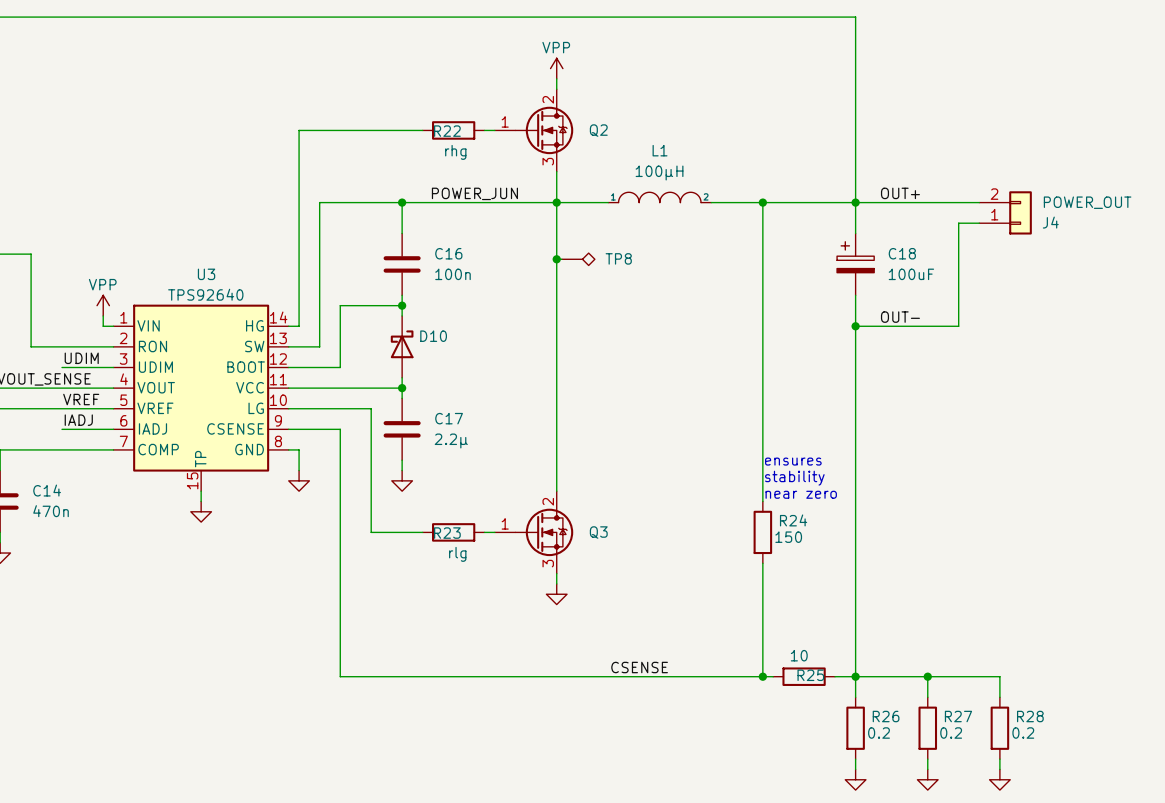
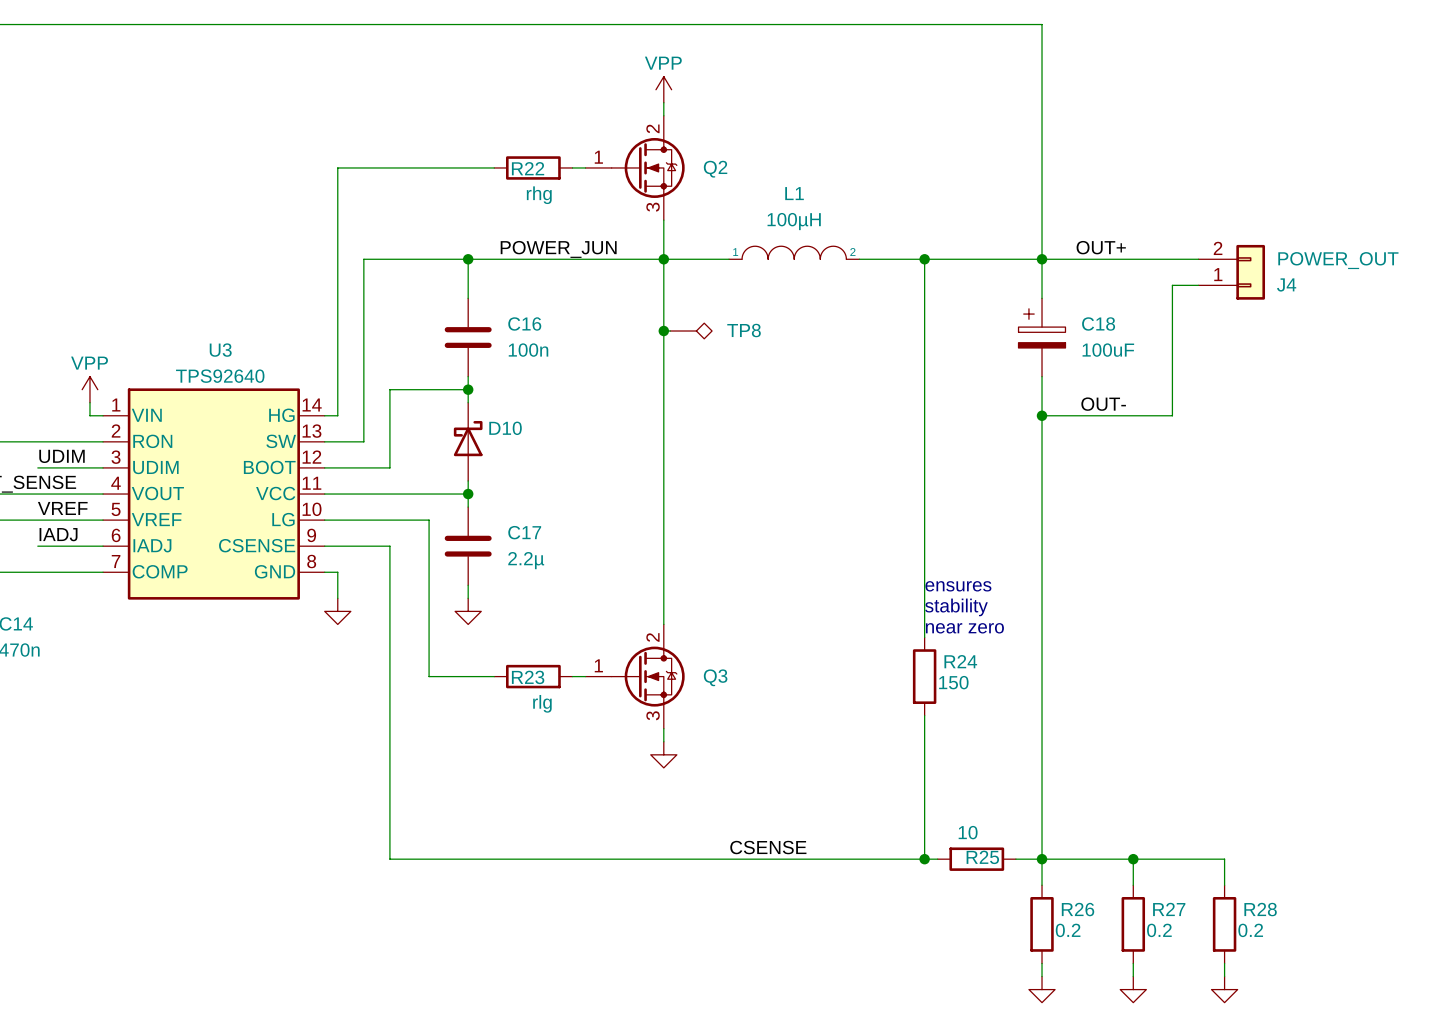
U3 symbol: [113, 304, 289, 492] -> [103, 388, 325, 600]
wire: (201, 491) (201, 501) -> none
power symbol: (201, 511) -> none

